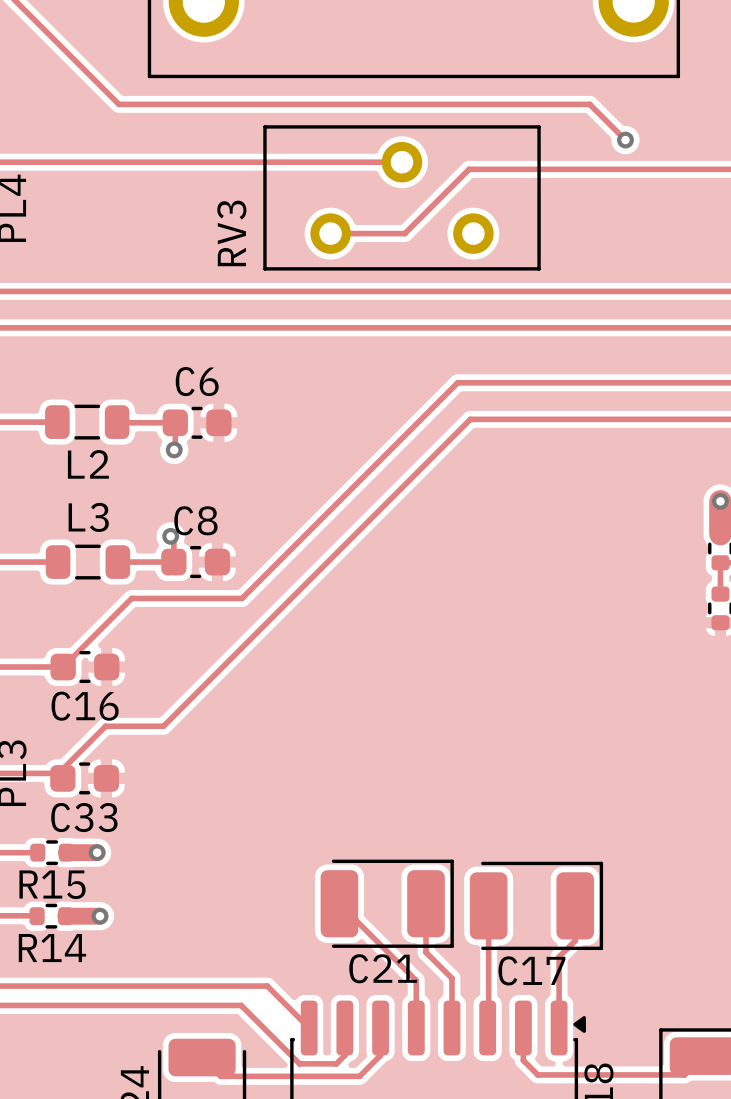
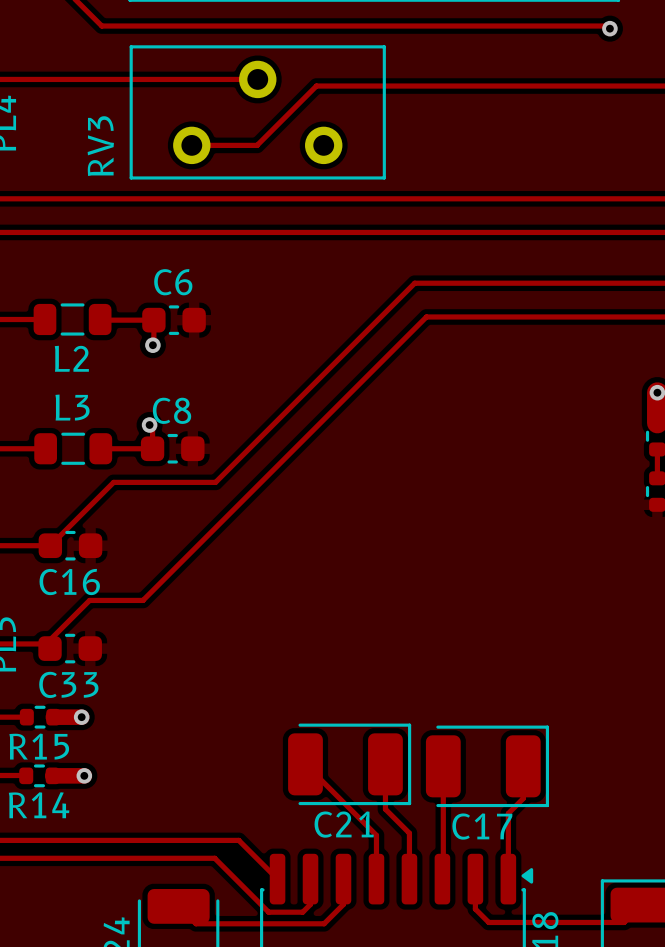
track: (589, 104) (625, 140) -> (536, 26) (607, 26) (609, 28)
via position: (625, 140) -> (609, 28)
track: (287, 162) (402, 162) -> none
track: (469, 169) (404, 233) (330, 233) -> (425, 86) (316, 86) (257, 145) (191, 145)
RV3 position: (402, 197) -> (257, 112)

